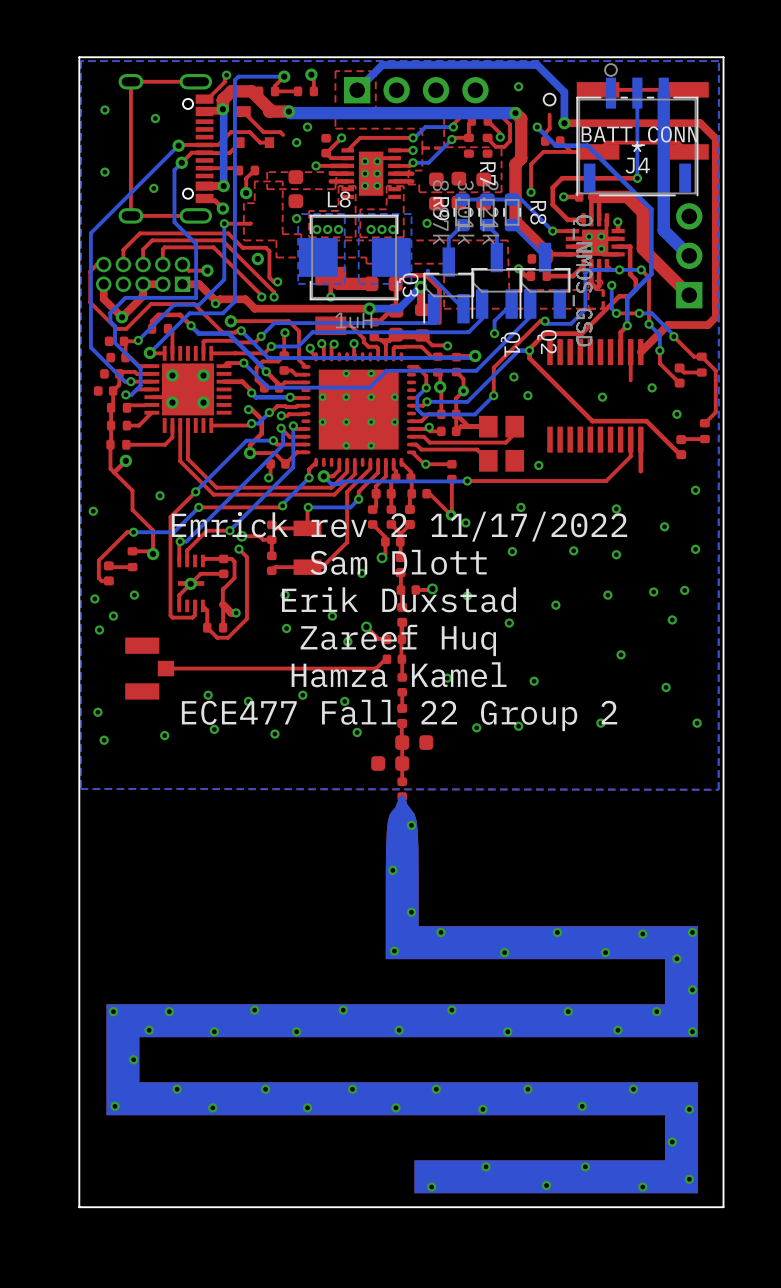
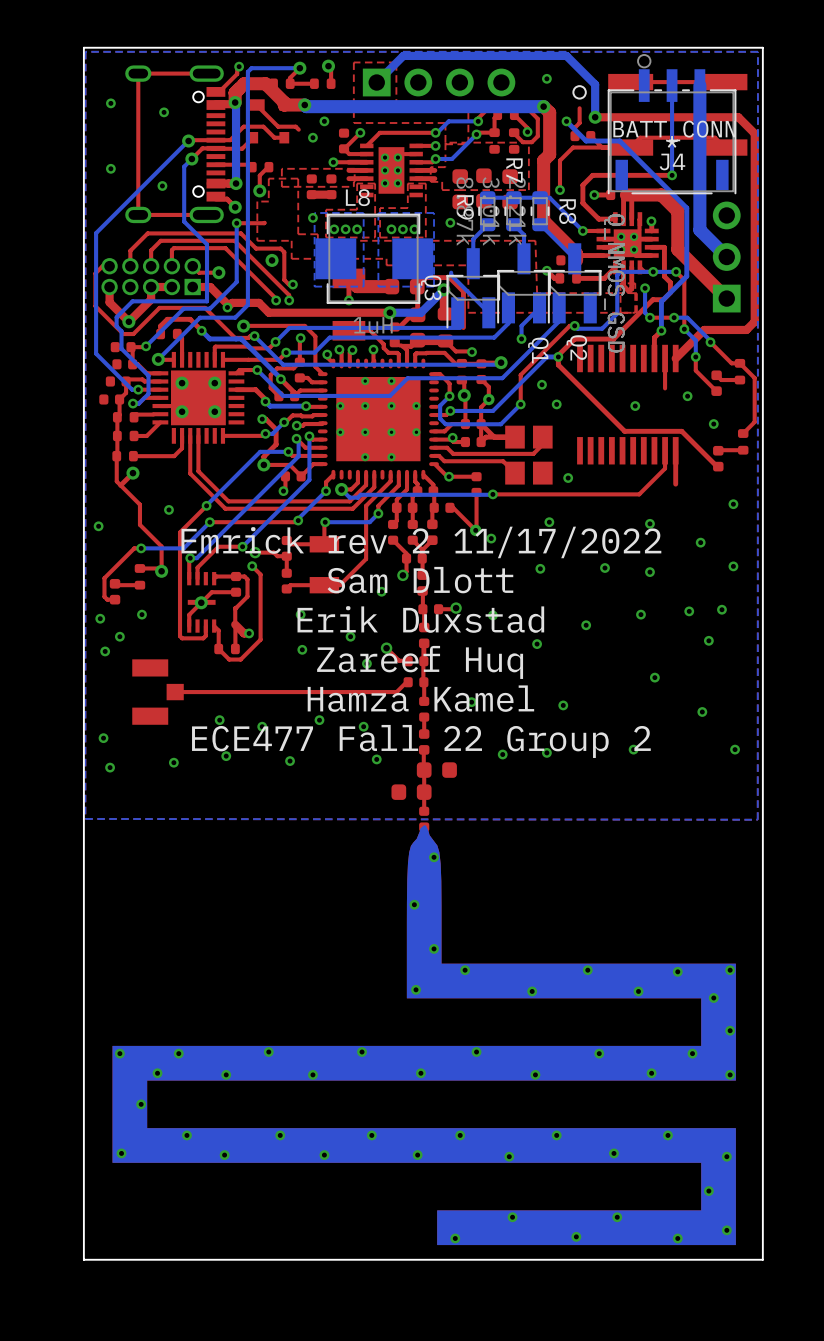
part footprint: [288, 170, 304, 209] -> [306, 174, 317, 200]
part: none -> (331, 186)
top track: none -> (331, 194) (311, 194)

